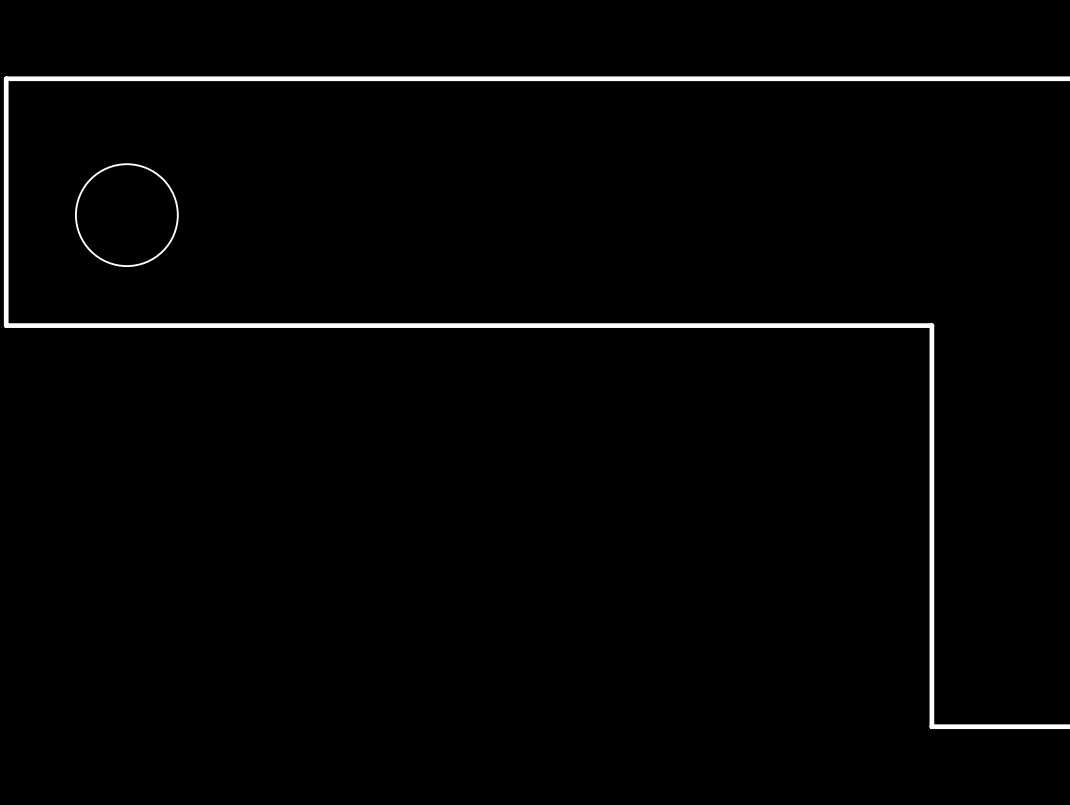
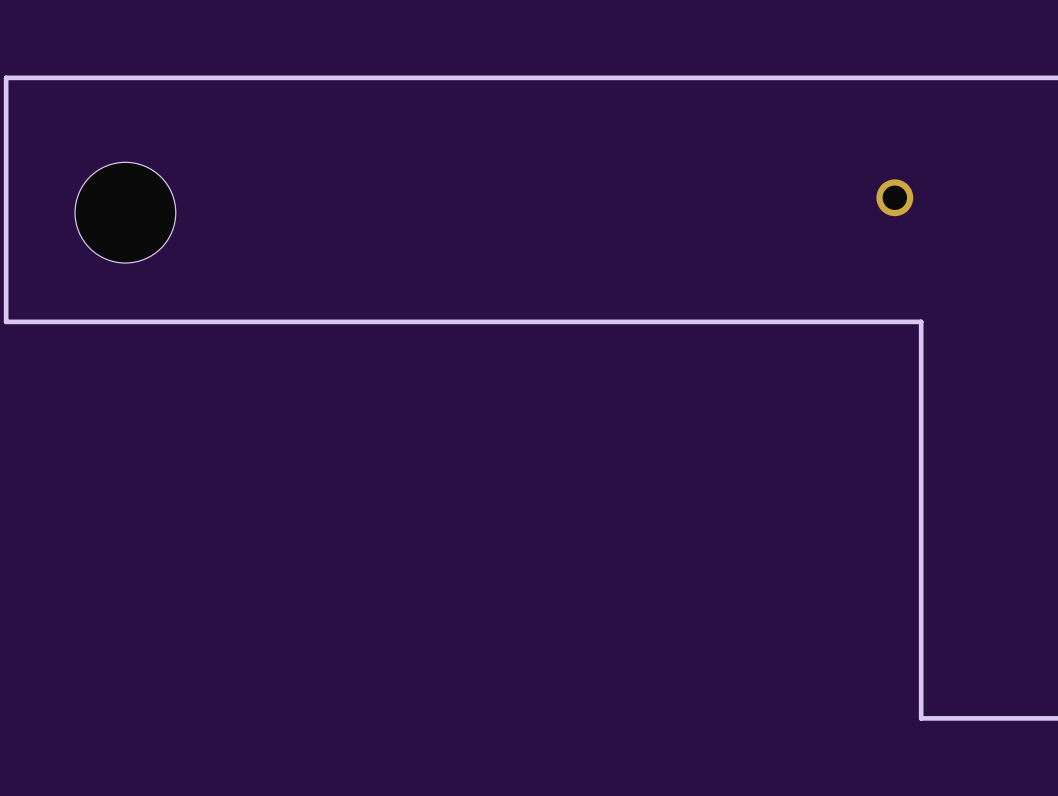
via: none -> (894, 197)

